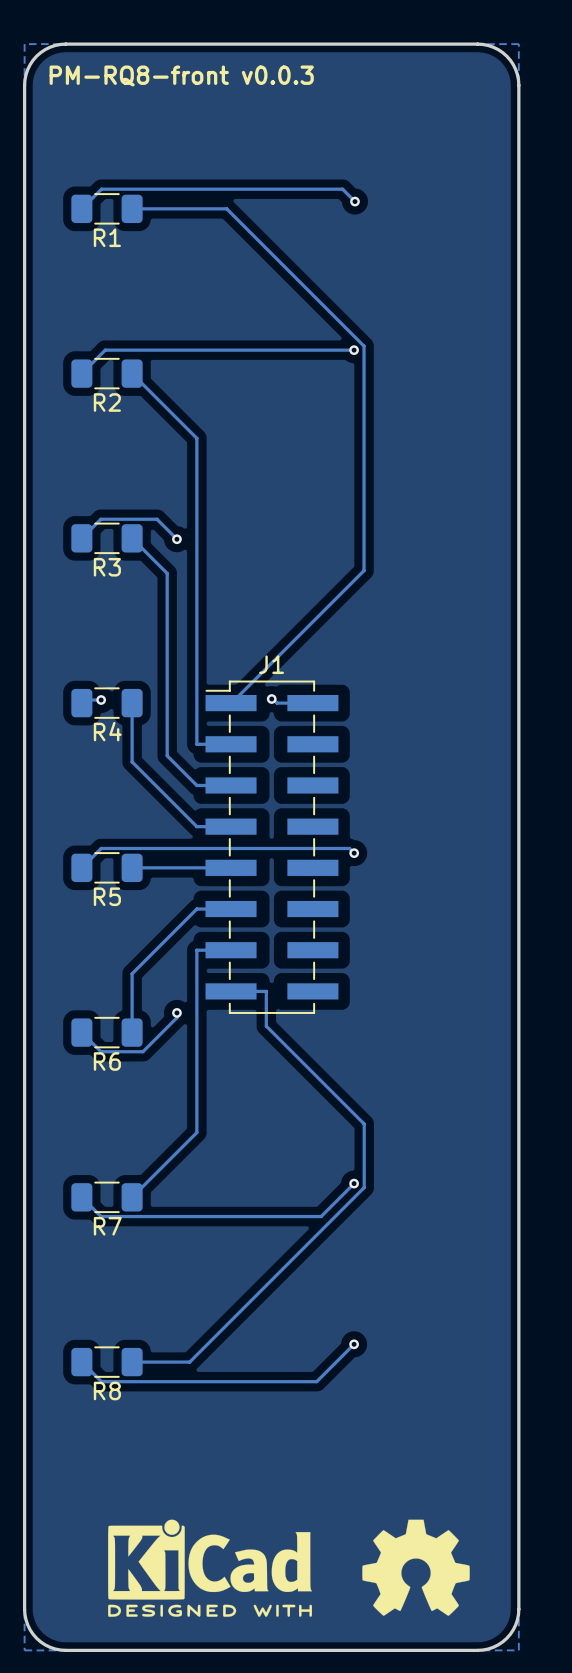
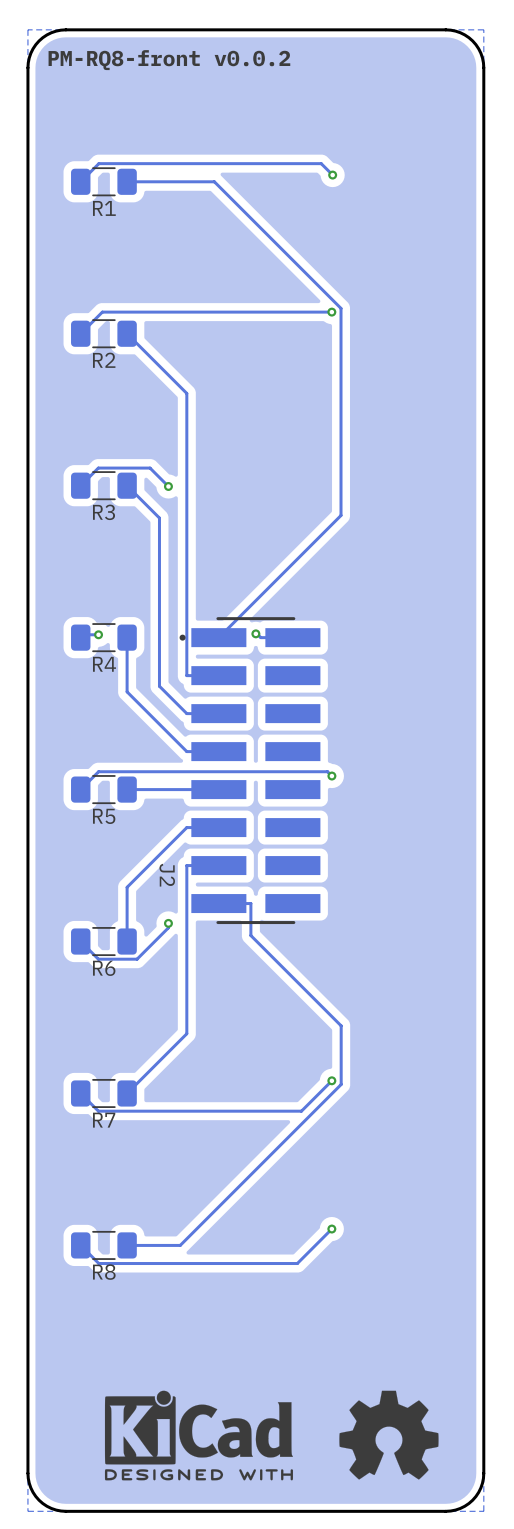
text: PM-RQ8-front v0.0.3 (181, 75) -> PM-RQ8-front v0.0.2 (169, 60)
J2: none -> (250, 770)
J1: (271, 847) -> none

